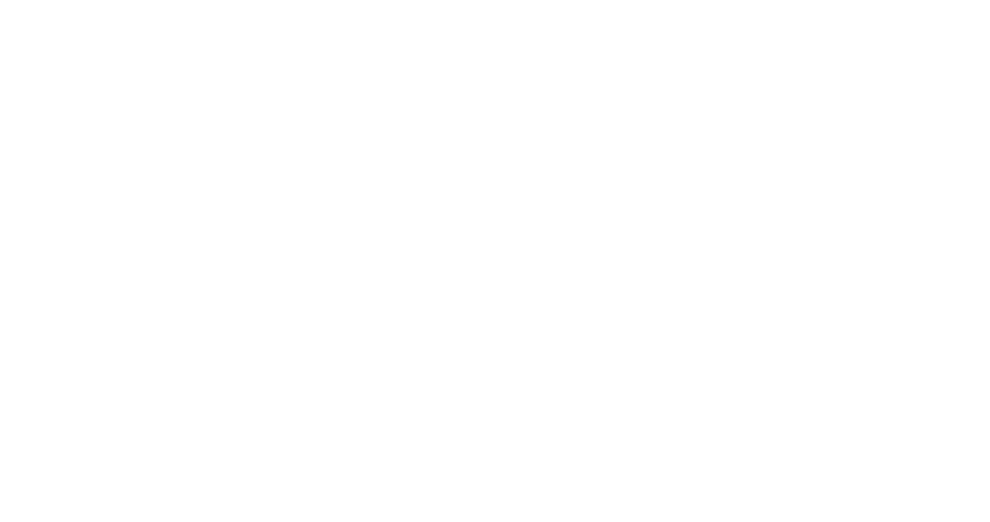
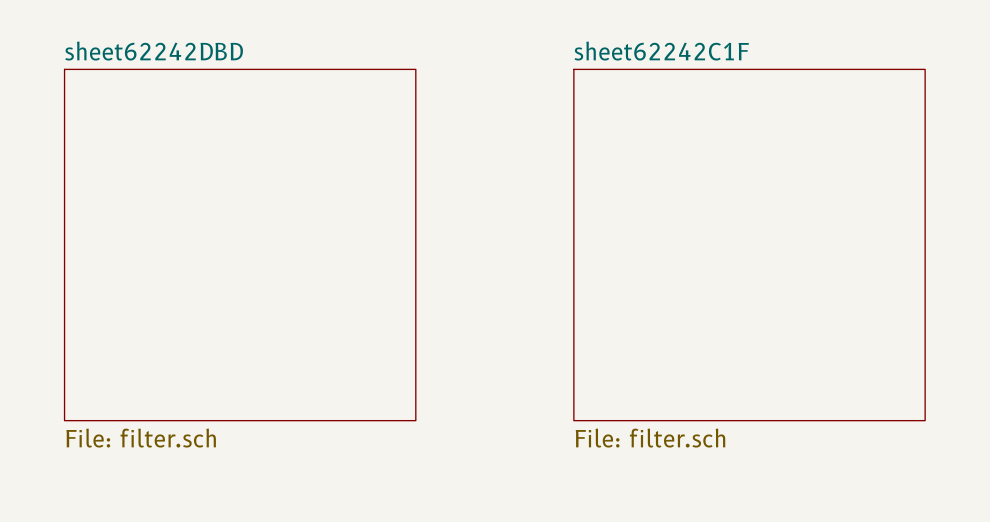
sheet sheet62242DBD: none -> File: filter.sch (240, 245)
sheet sheet62242C1F: none -> File: filter.sch (749, 245)

